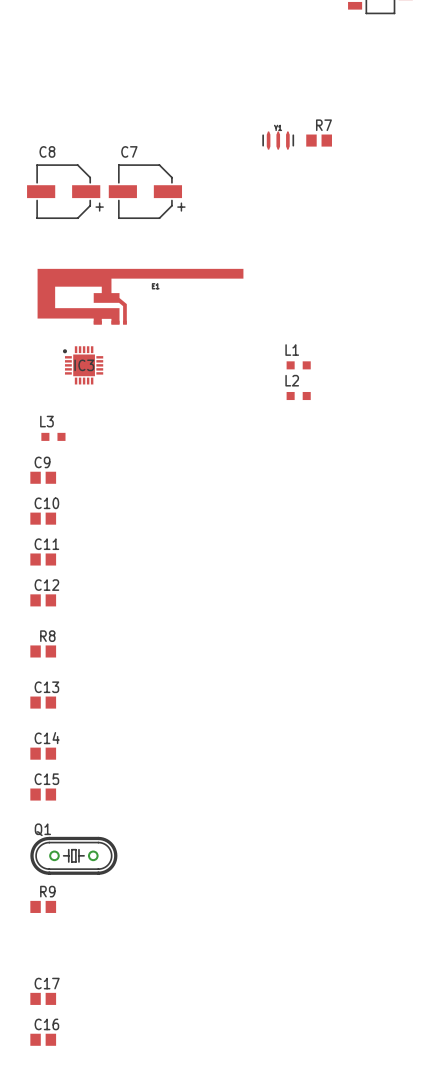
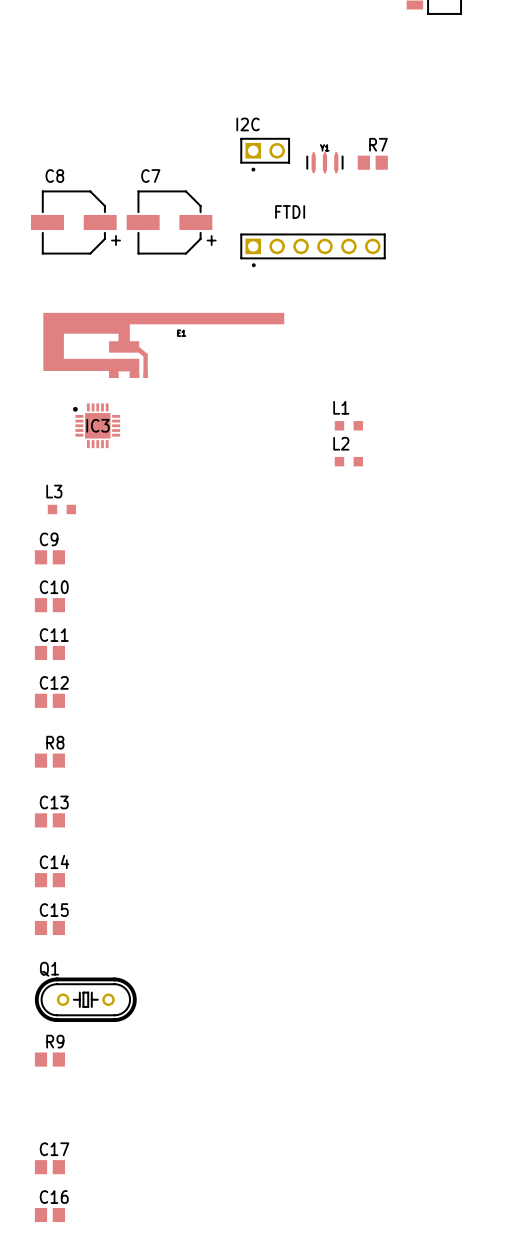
I2C: none -> (265, 154)
FTDI: none -> (313, 250)

